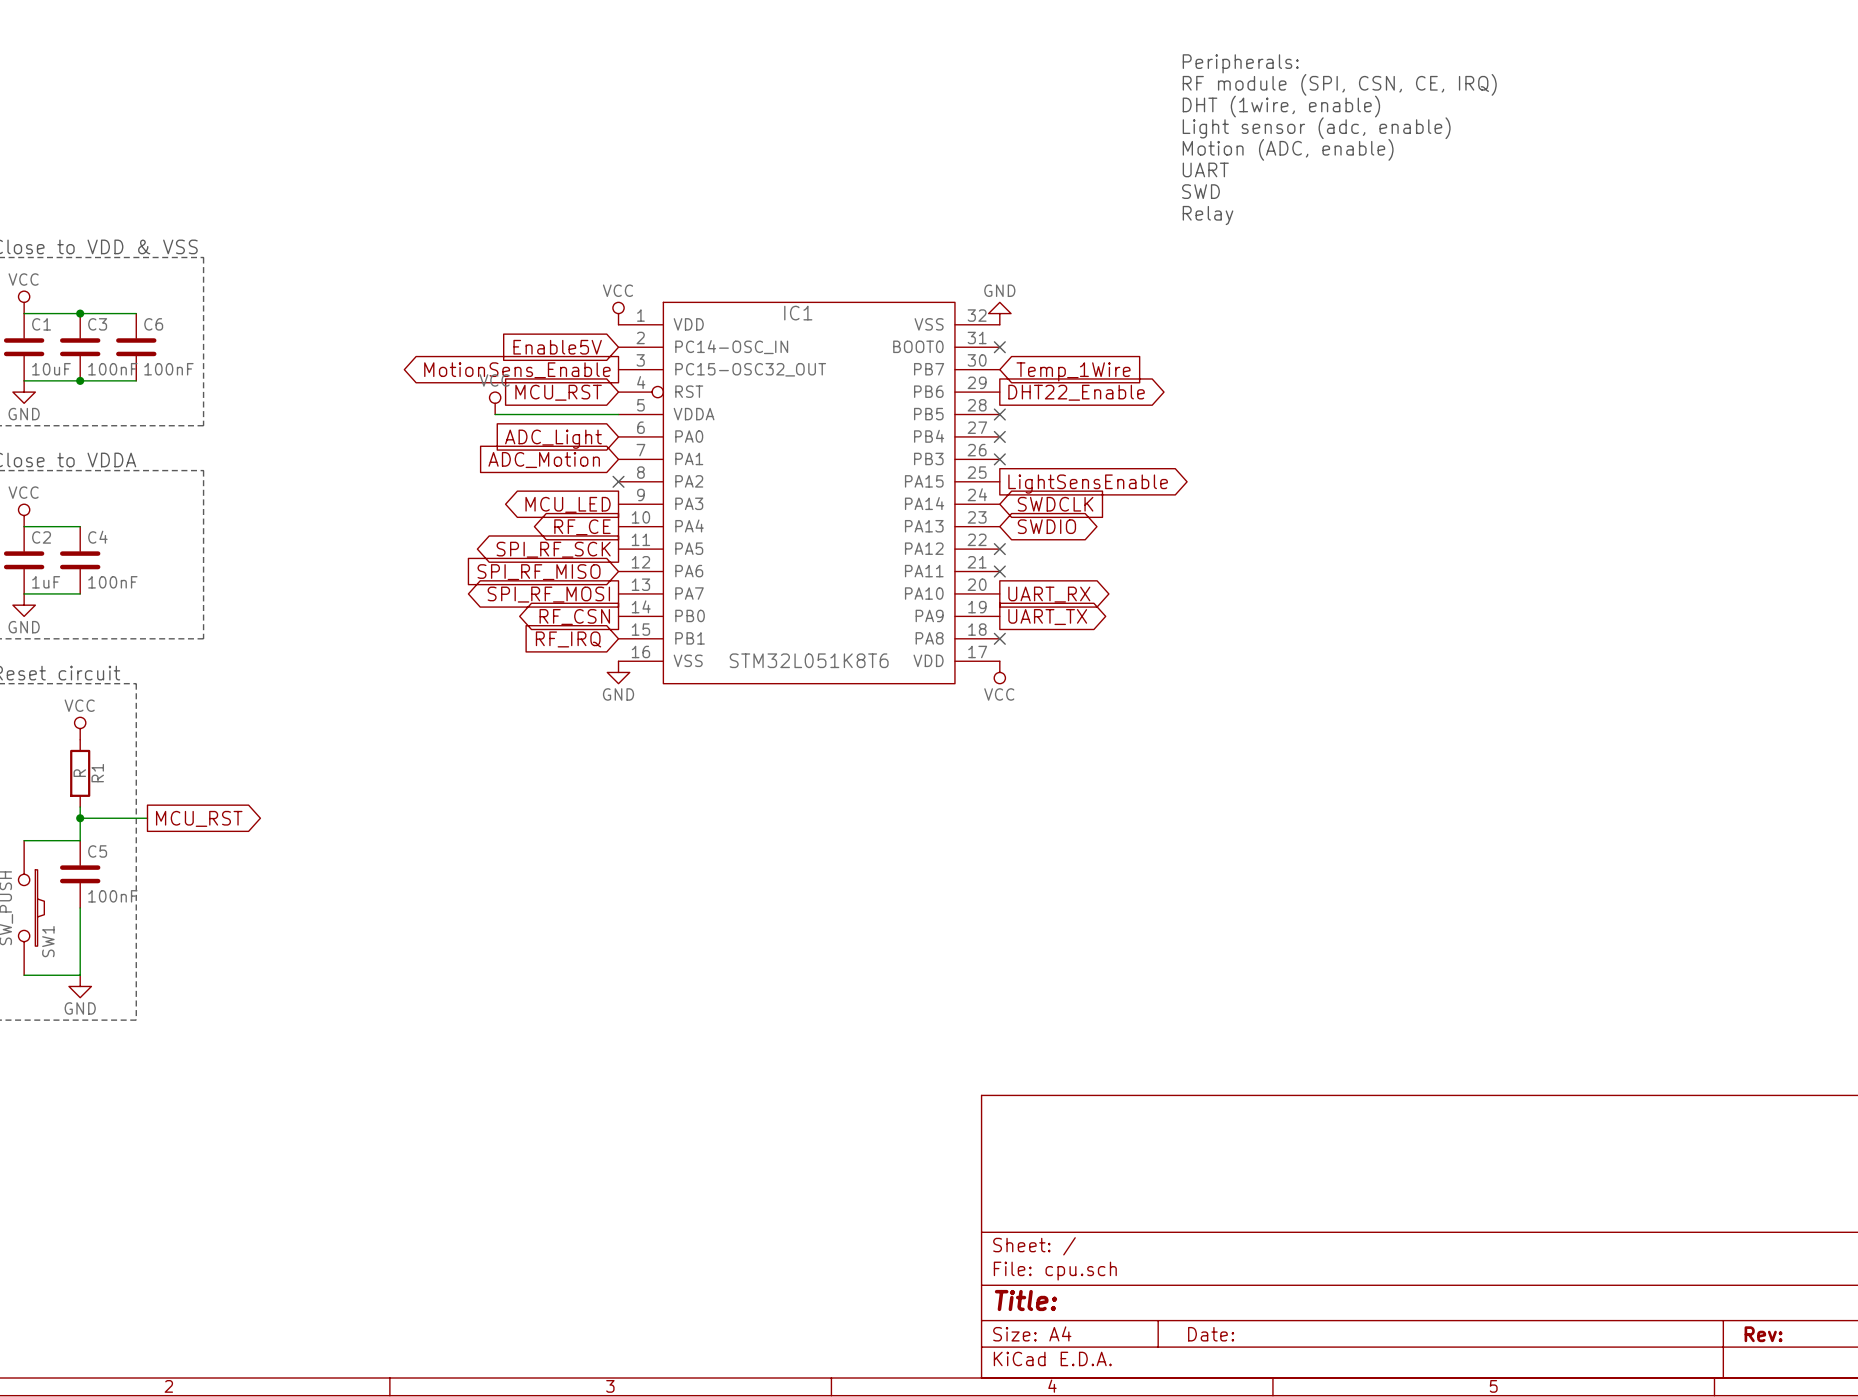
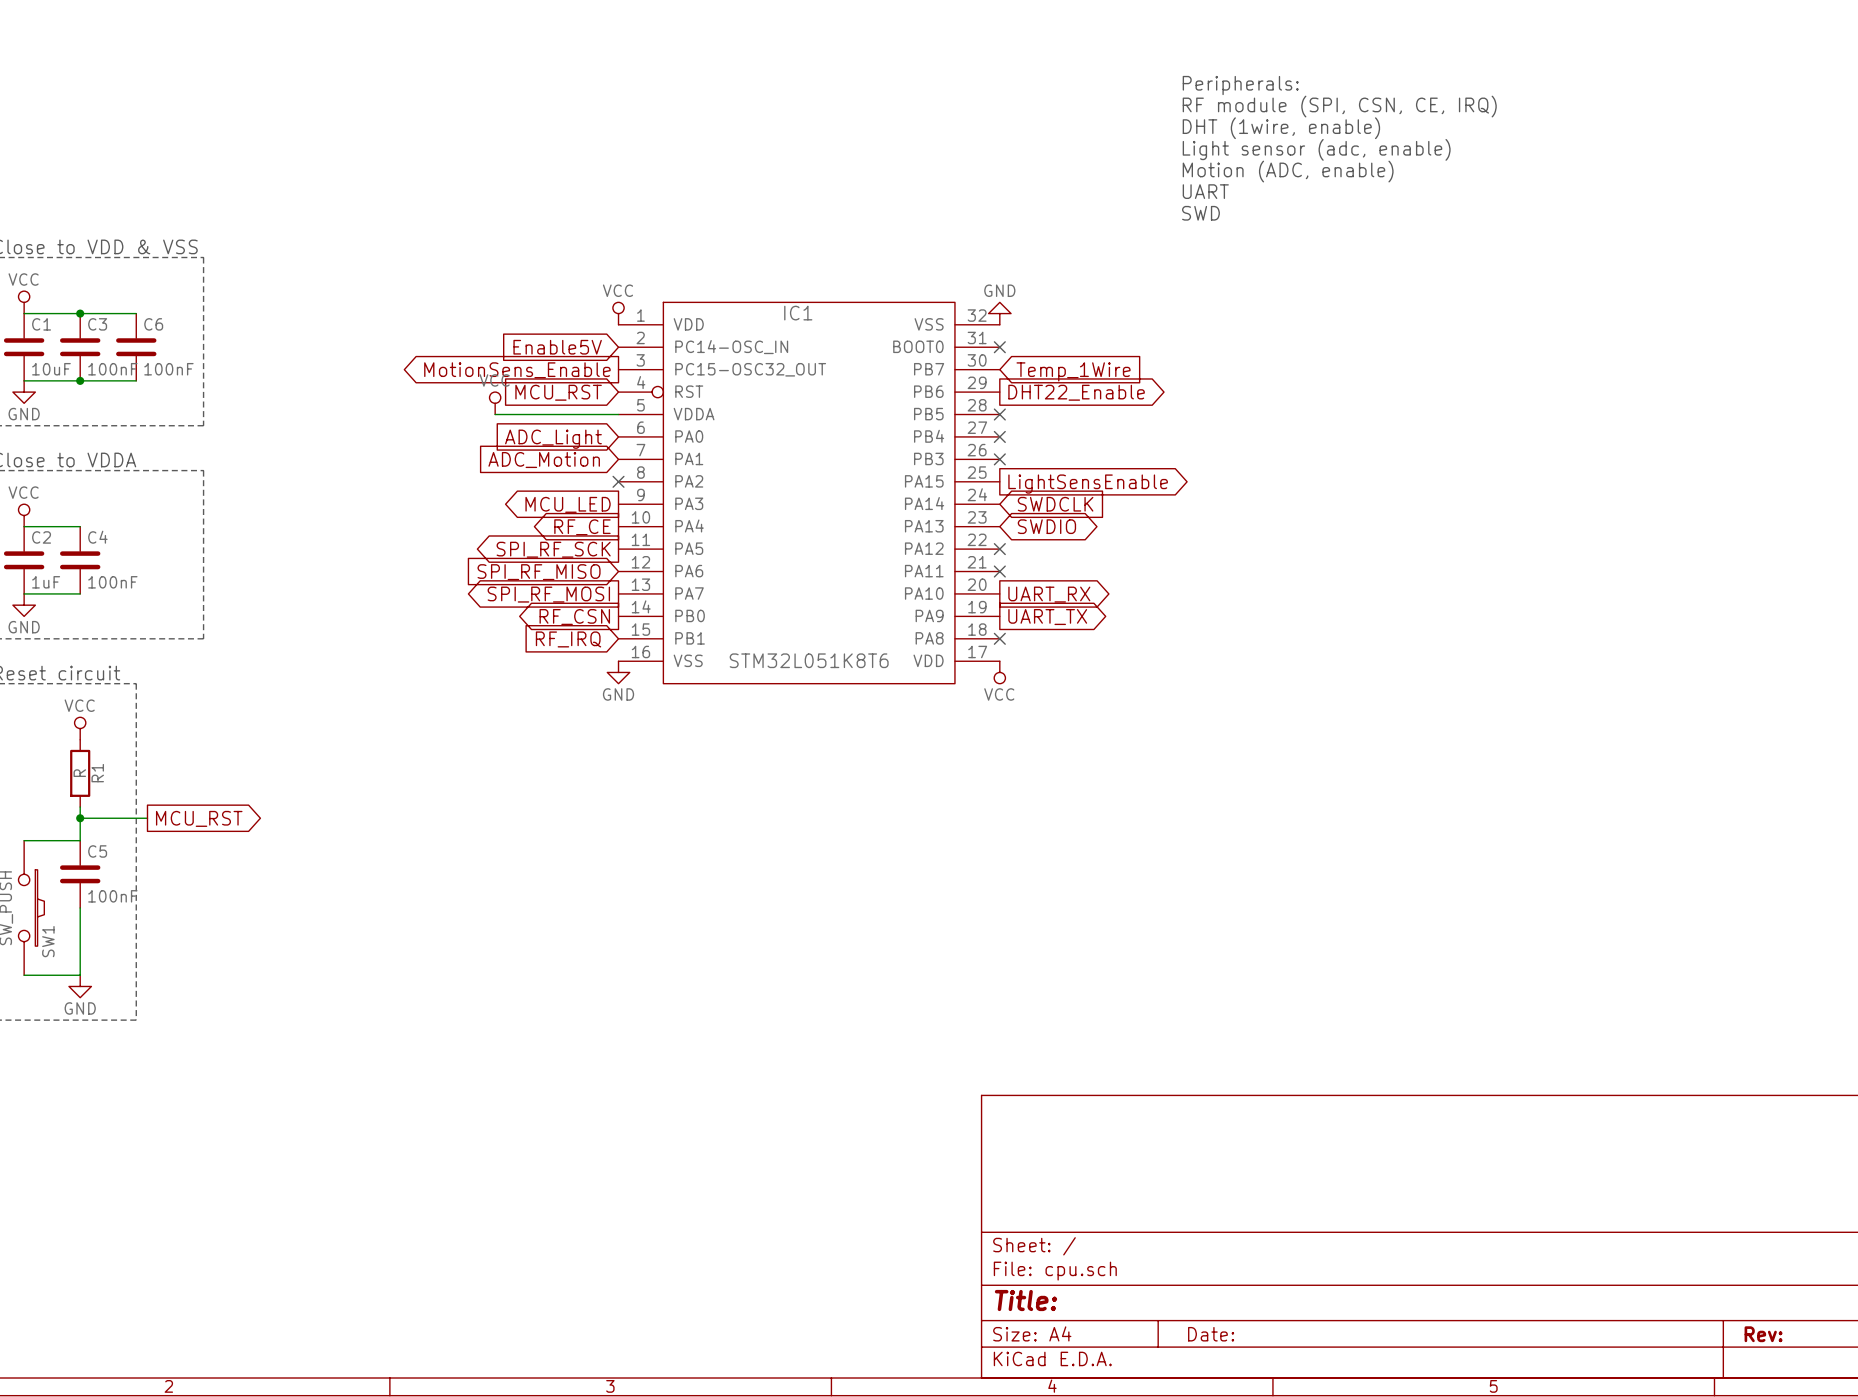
text: Peripherals: (1240, 63) -> none
text: RF module (SPI, CSN, CE, IRQ) (1339, 84) -> Peripherals: (1240, 85)
text: DHT (1wire, enable) (1281, 106) -> RF module (SPI, CSN, CE, IRQ) (1339, 106)
text: Light sensor (adc, enable) (1316, 128) -> DHT (1wire, enable) (1281, 128)
text: Motion (ADC, enable) (1288, 149) -> Light sensor (adc, enable) (1316, 149)
text: UART (1205, 169) -> Motion (ADC, enable) (1288, 171)
text: SWD (1200, 191) -> UART (1205, 191)
text: Relay (1208, 215) -> SWD (1200, 213)

